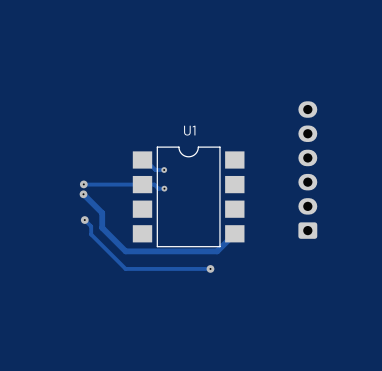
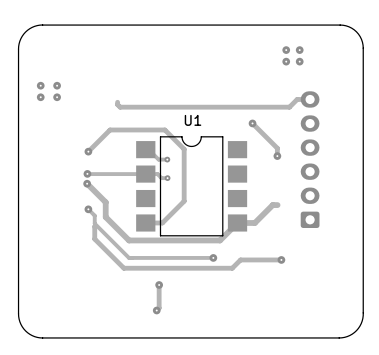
board edge: none -> (42, 24) (32, 27) (25, 32) (19, 41) (18, 49) (18, 316) (25, 330) (32, 335) (42, 338)
board edge: none -> (42, 25) (343, 25) (351, 28) (358, 34) (363, 48) (363, 315) (361, 323) (354, 332) (339, 337) (42, 337)
via: none -> (286, 50)
via: none -> (299, 50)
via: none -> (286, 61)
via: none -> (299, 61)
via: none -> (40, 85)
via: none -> (57, 85)
via: none -> (40, 97)
via: none -> (57, 97)
track: none -> (310, 99) (297, 99) (289, 107) (120, 107) (117, 102)
track: none -> (252, 123) (277, 148) (277, 156)
via: none -> (252, 123)
track: none -> (88, 151) (110, 129) (164, 129) (184, 149) (184, 201) (162, 222) (145, 222)
via: none -> (88, 151)
via: none -> (277, 156)
track: none -> (277, 205) (272, 205) (254, 222) (237, 222)
track: none -> (93, 226) (94, 239) (123, 268) (232, 268) (240, 259) (281, 259)
via: none -> (281, 259)
track: none -> (159, 284) (159, 308) (156, 310)
via: none -> (159, 284)
via: none -> (156, 310)

